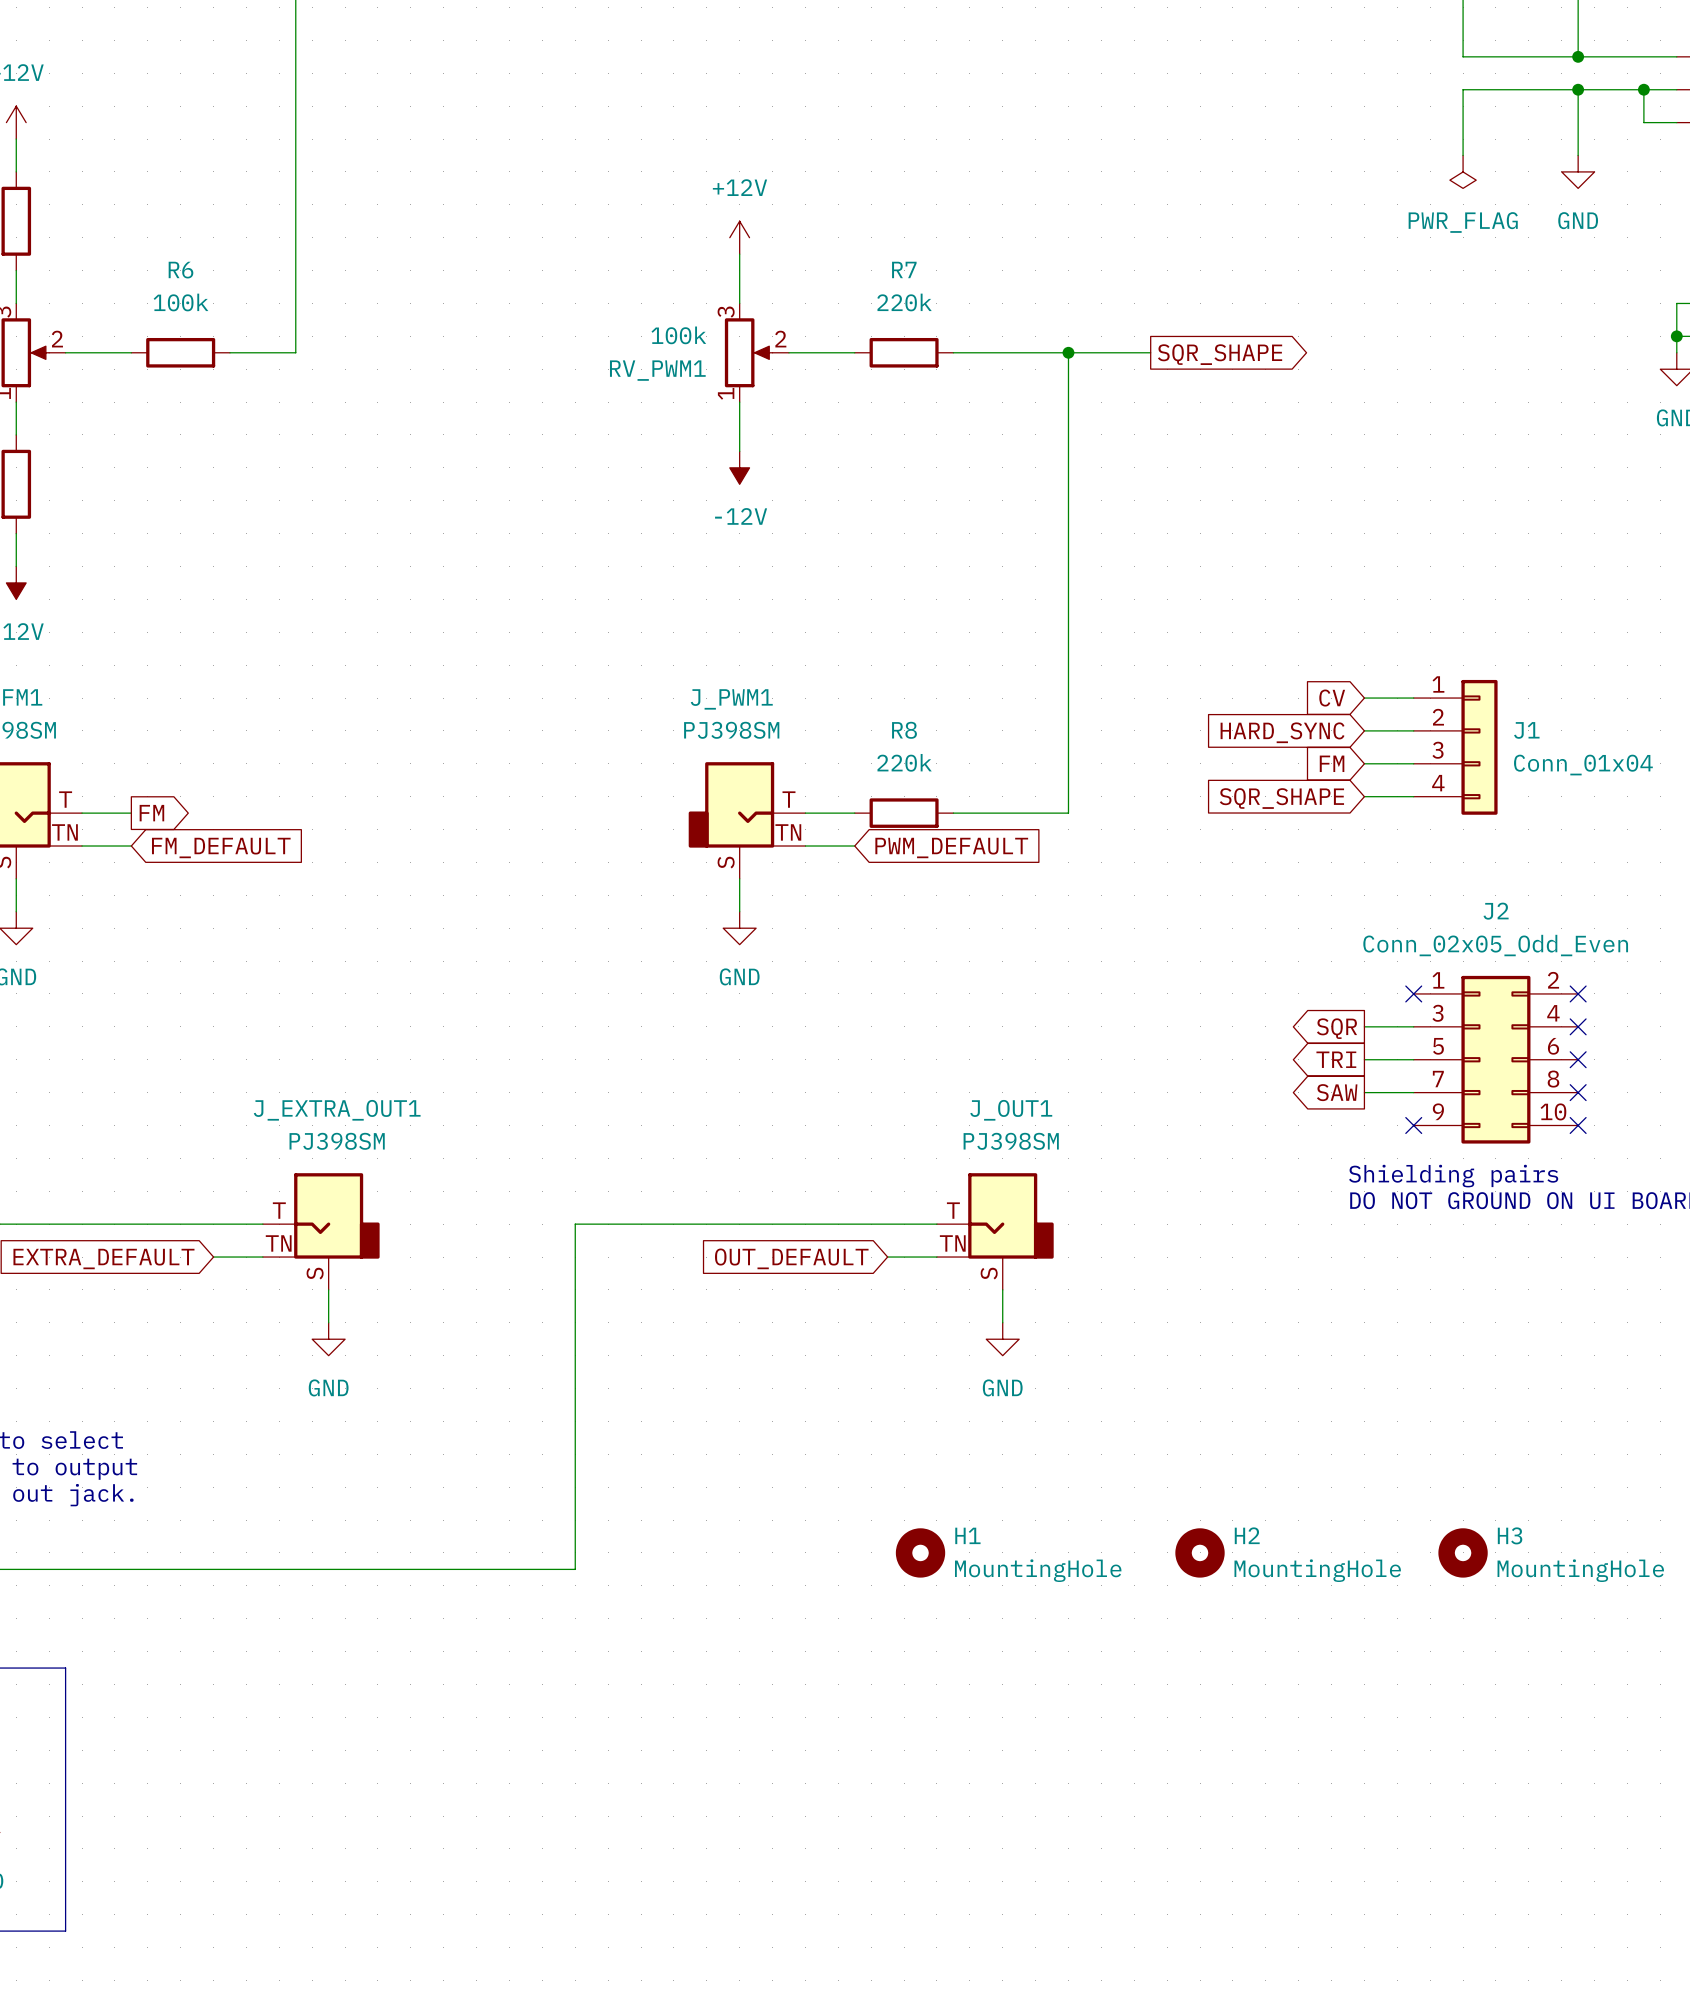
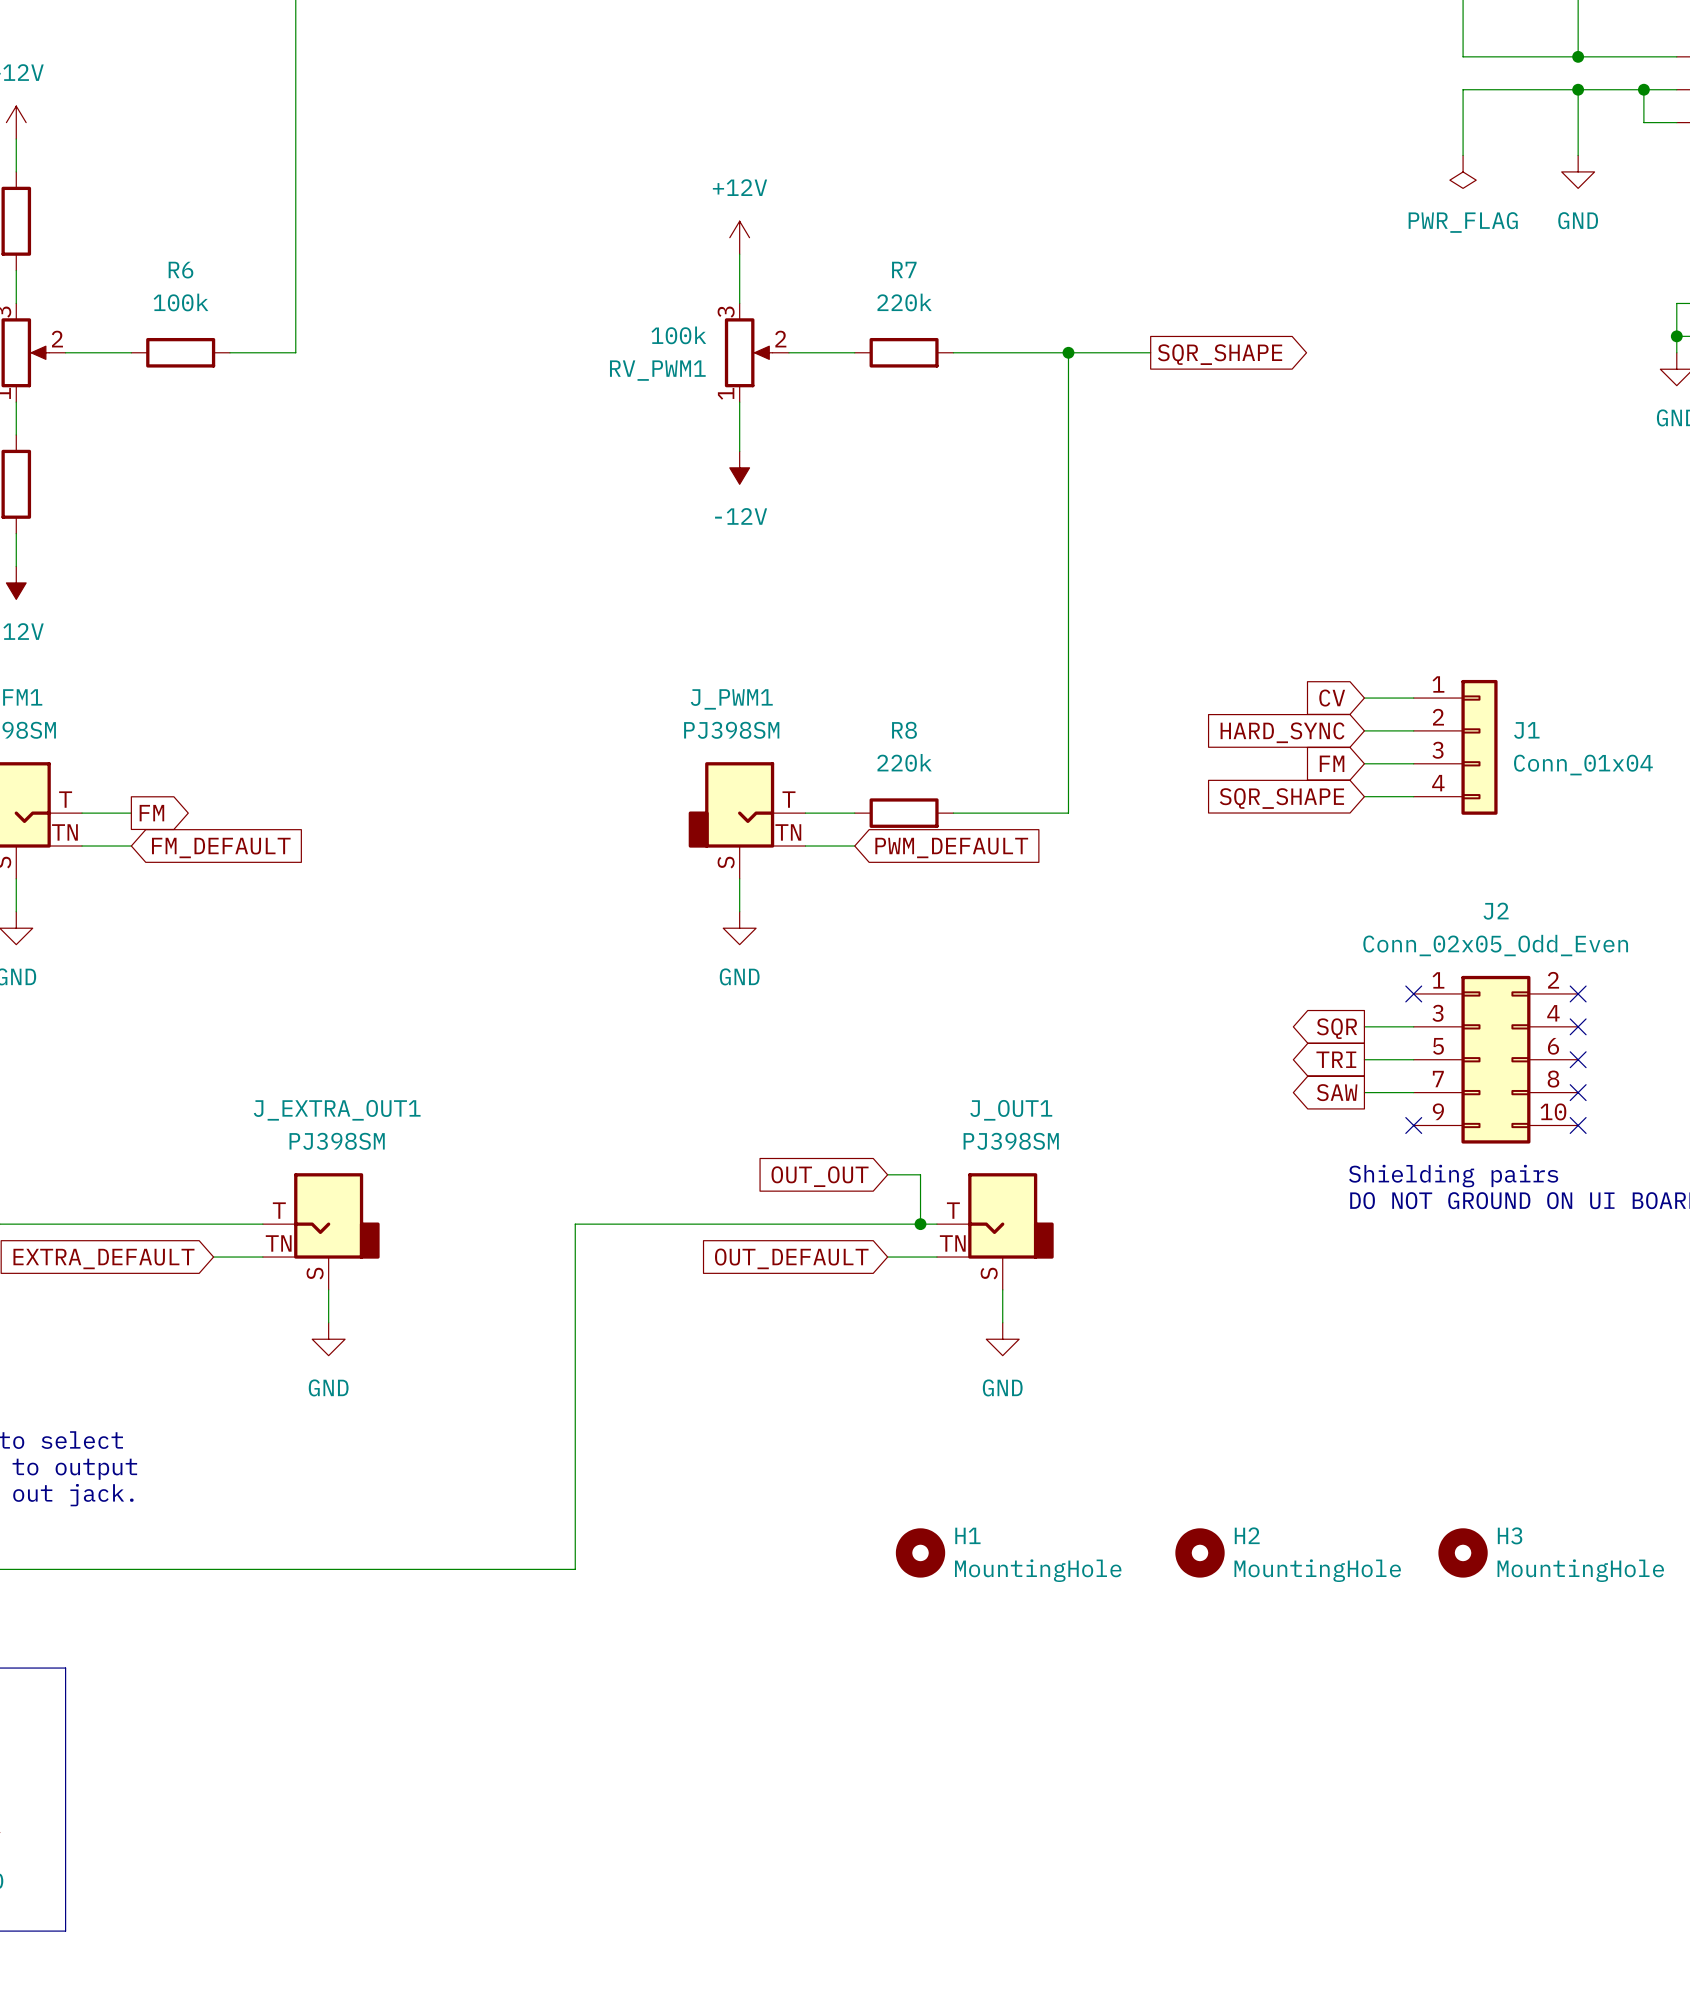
wire: none -> (887, 1174) (920, 1174) (920, 1224)
global label: none -> OUT_OUT (820, 1176)
junction: none -> (920, 1224)

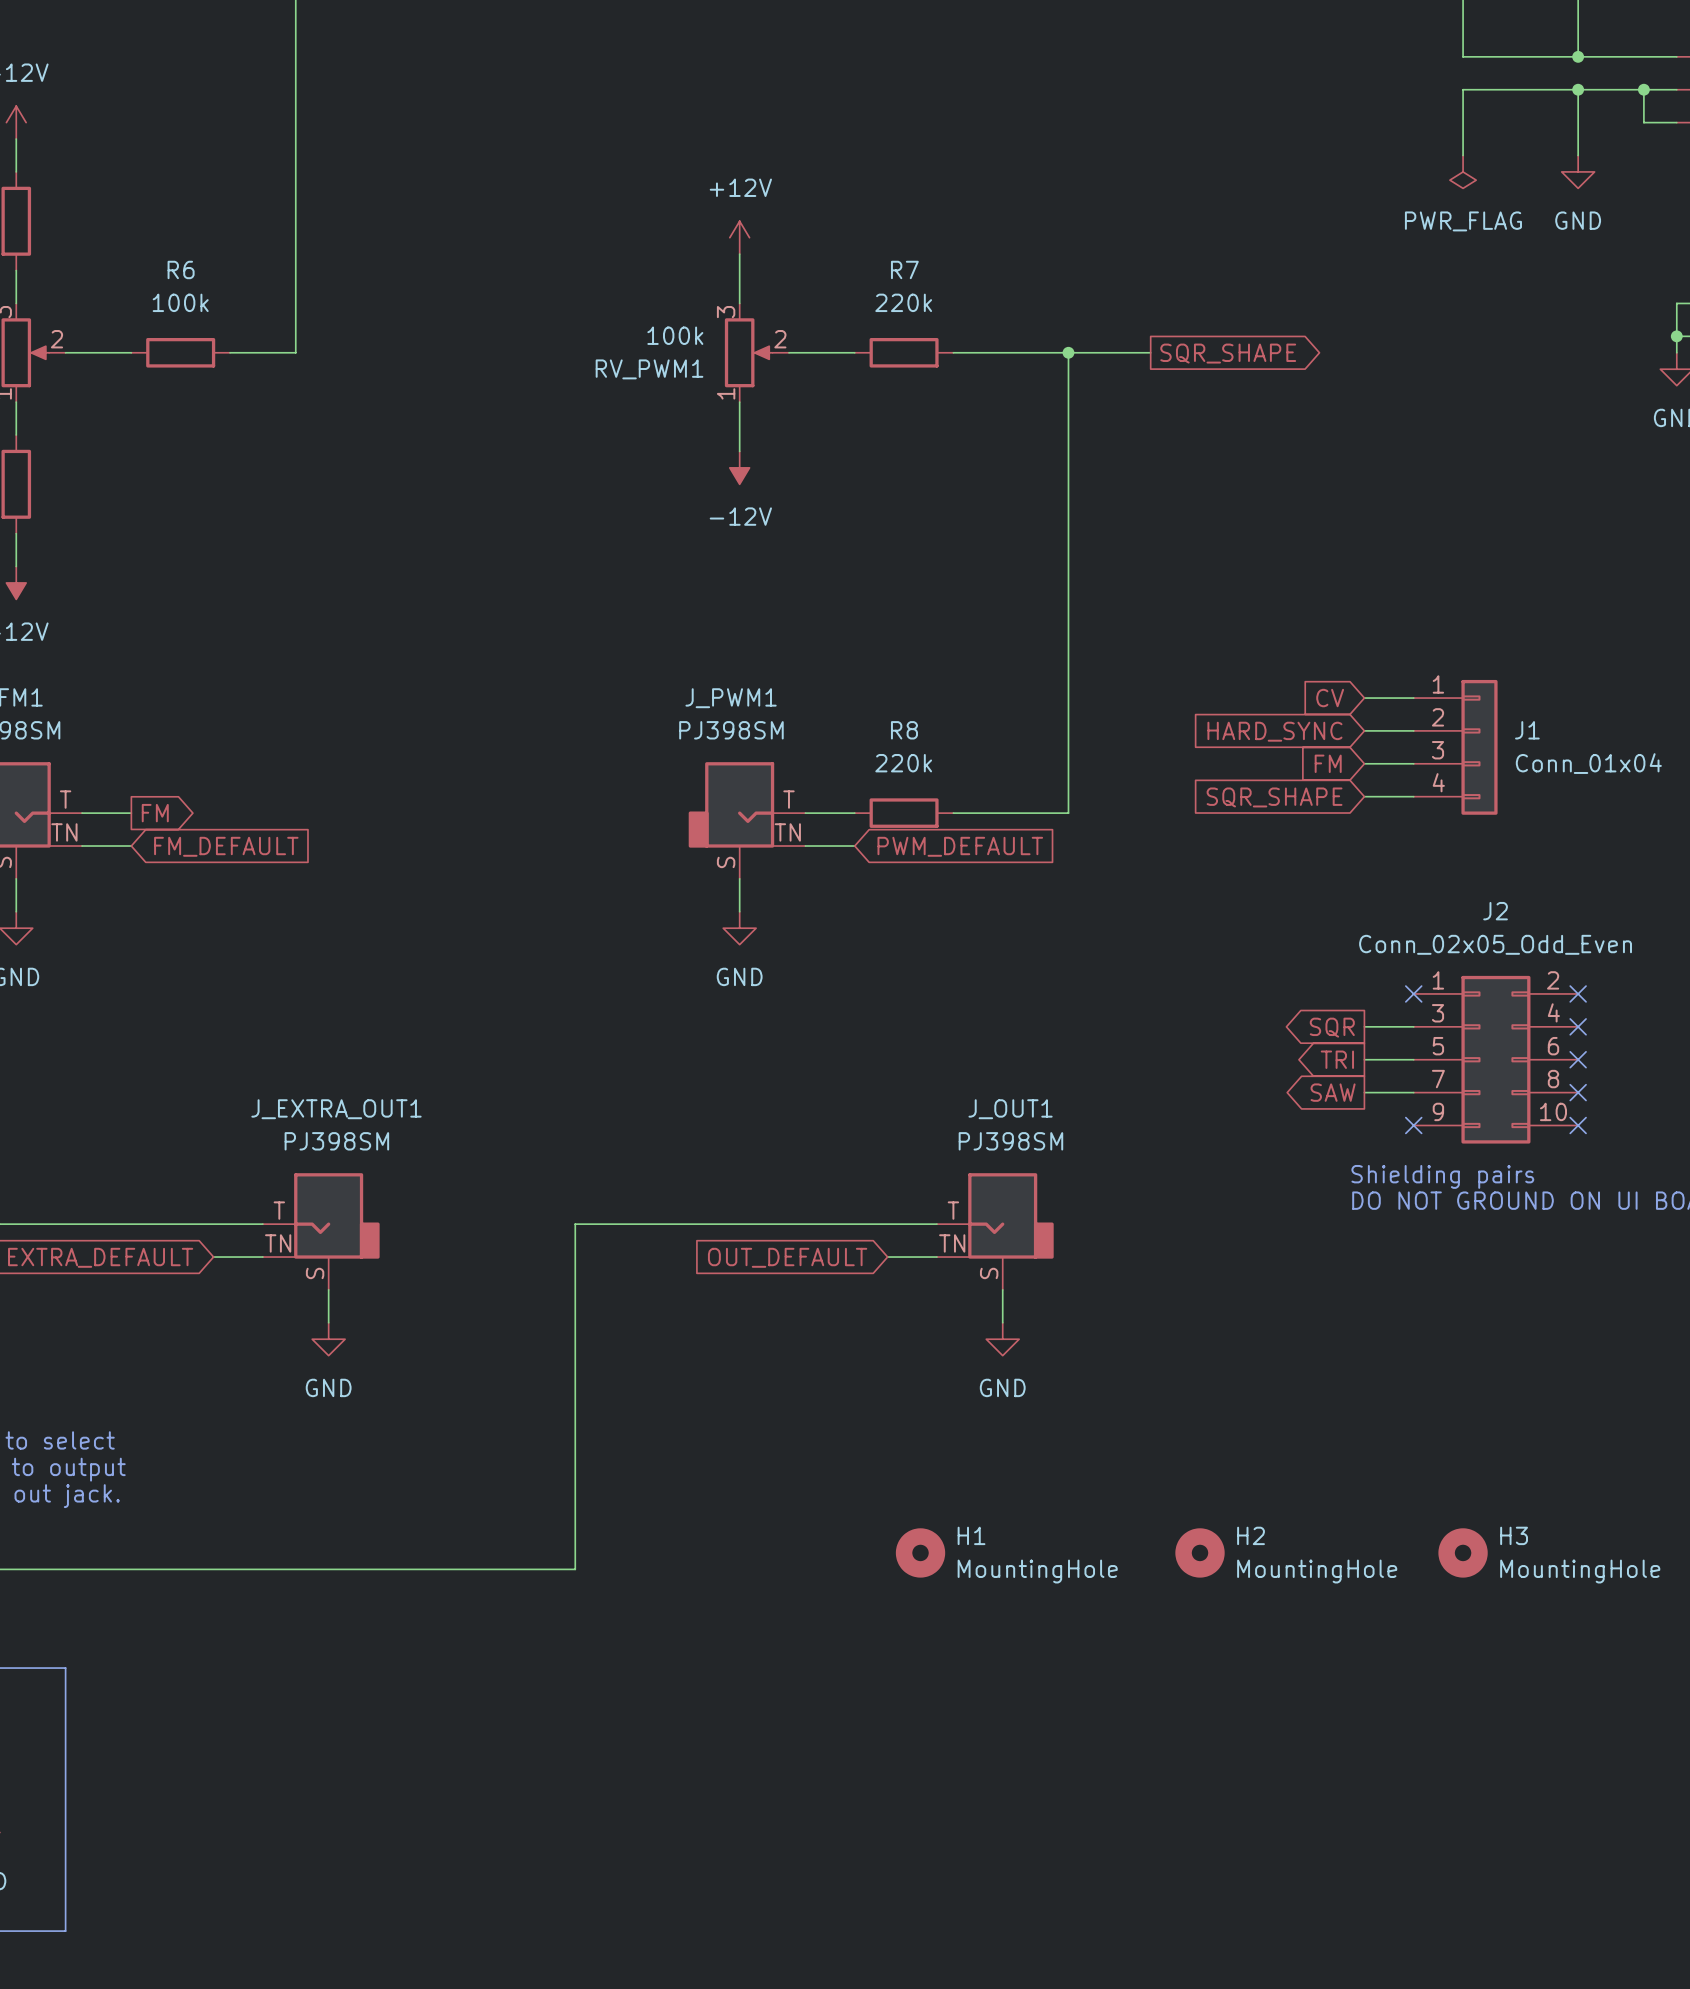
wire: (887, 1174) (920, 1174) (920, 1224) -> none
global label: OUT_OUT (820, 1176) -> none
junction: (920, 1224) -> none

